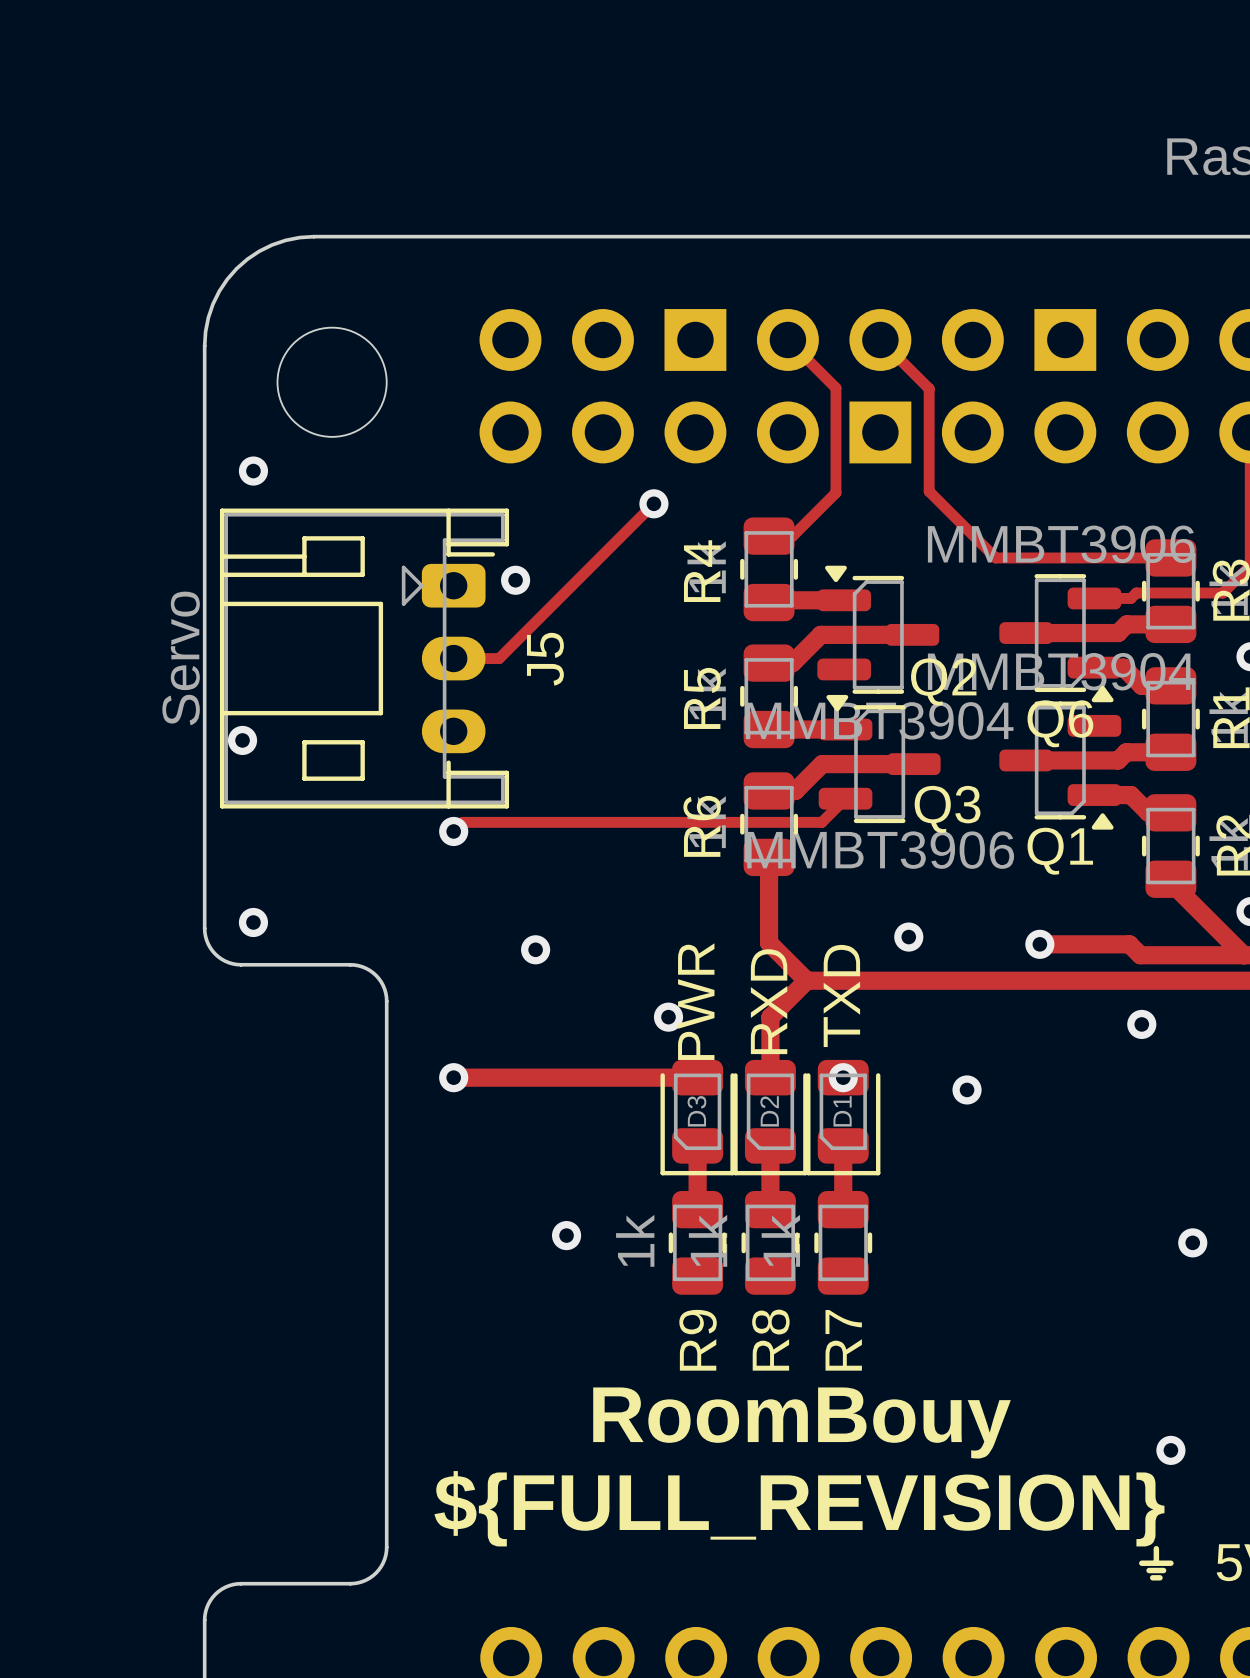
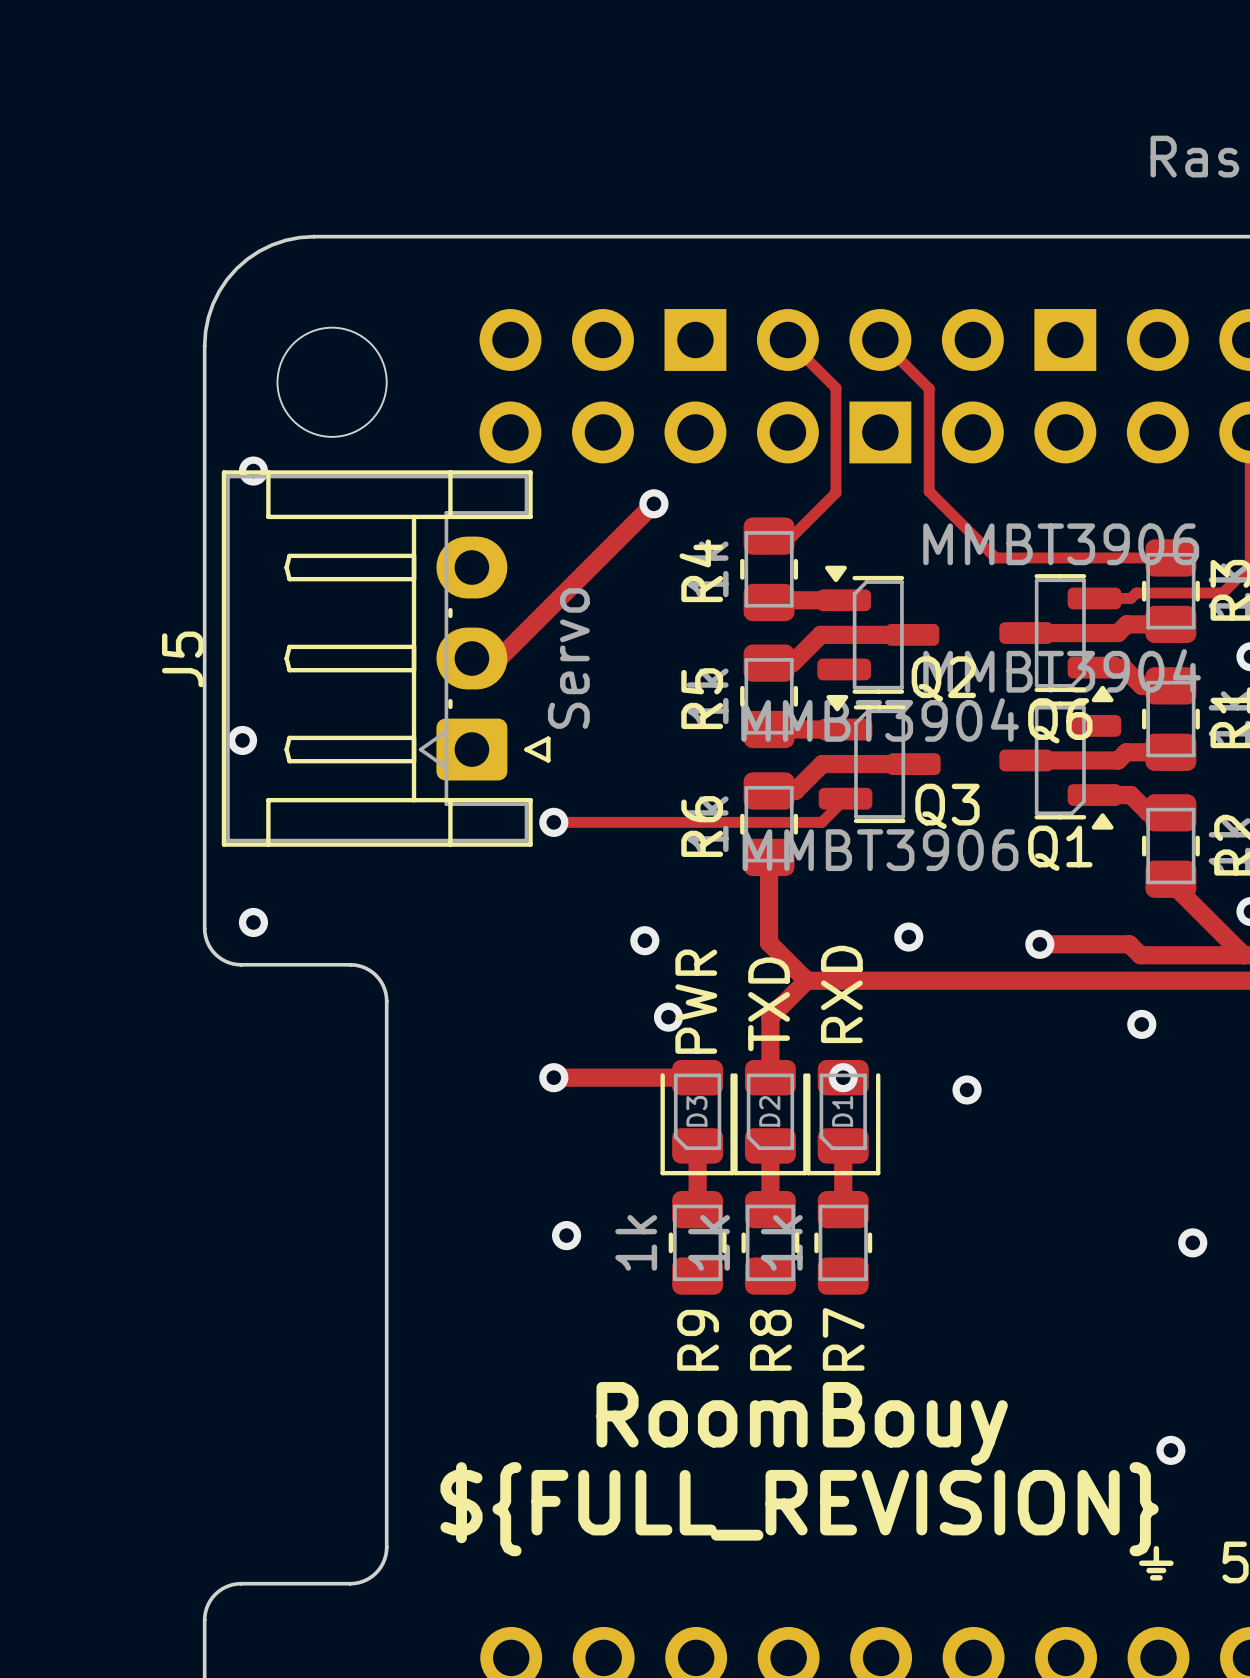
track width: thin (653, 503) (499, 658) (471, 658) -> thick (653, 503) (499, 658) (471, 658)
J5 footprint: [219, 508, 510, 809] -> [221, 470, 551, 847]
via: (515, 580) -> none
J5 value position: Servo (181, 658) -> Servo (568, 658)
J5 name position: J5 (545, 659) -> J5 (182, 659)
track: (553, 822) (462, 822) (453, 831) -> none
via: none -> (553, 822)
via: (453, 831) -> none
via: none -> (644, 940)
via: (535, 949) -> none
D1 value: TXD (841, 995) -> RXD (841, 994)
D2 value: RXD (769, 1001) -> TXD (769, 1004)
track: (453, 1077) (553, 1077) -> none
via: (453, 1077) -> none
via: none -> (553, 1077)

